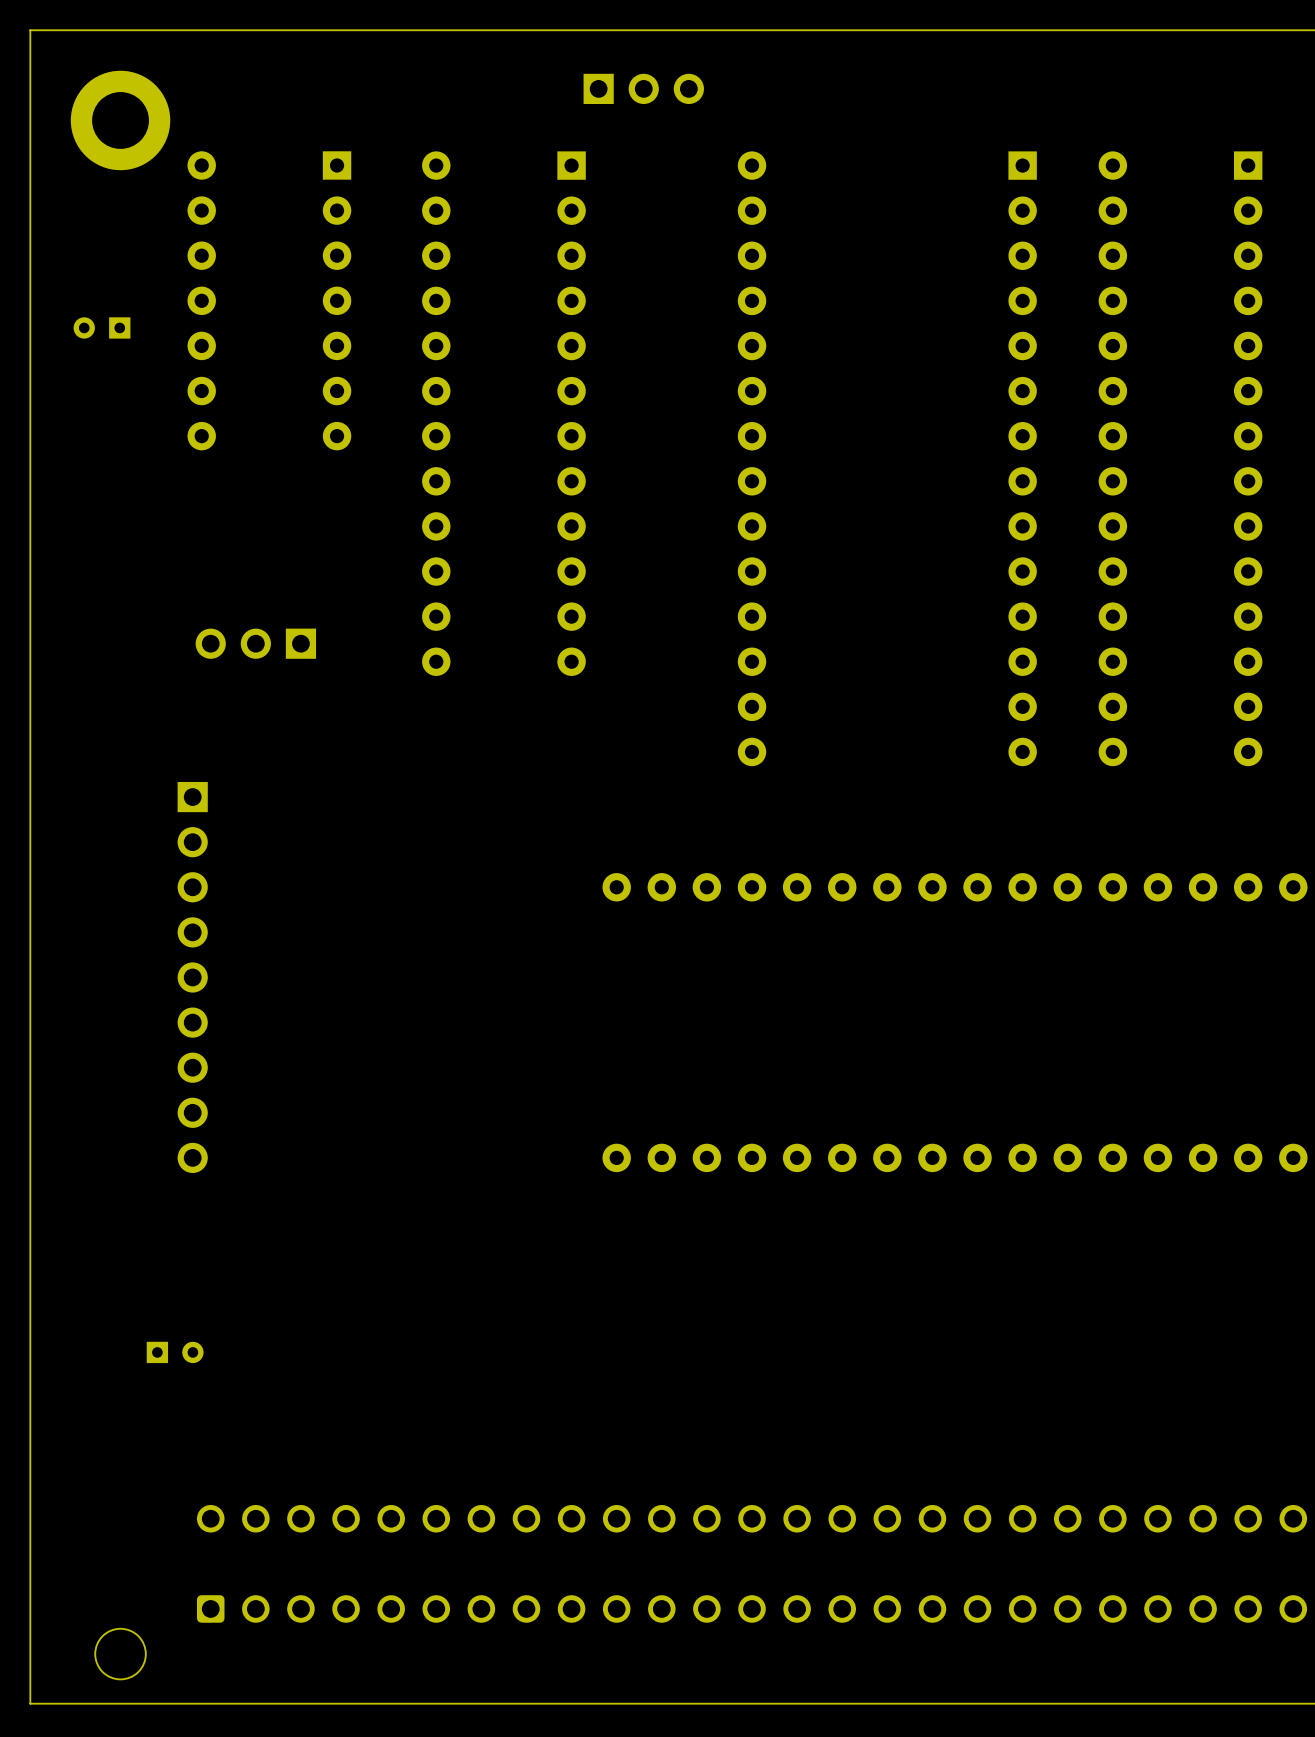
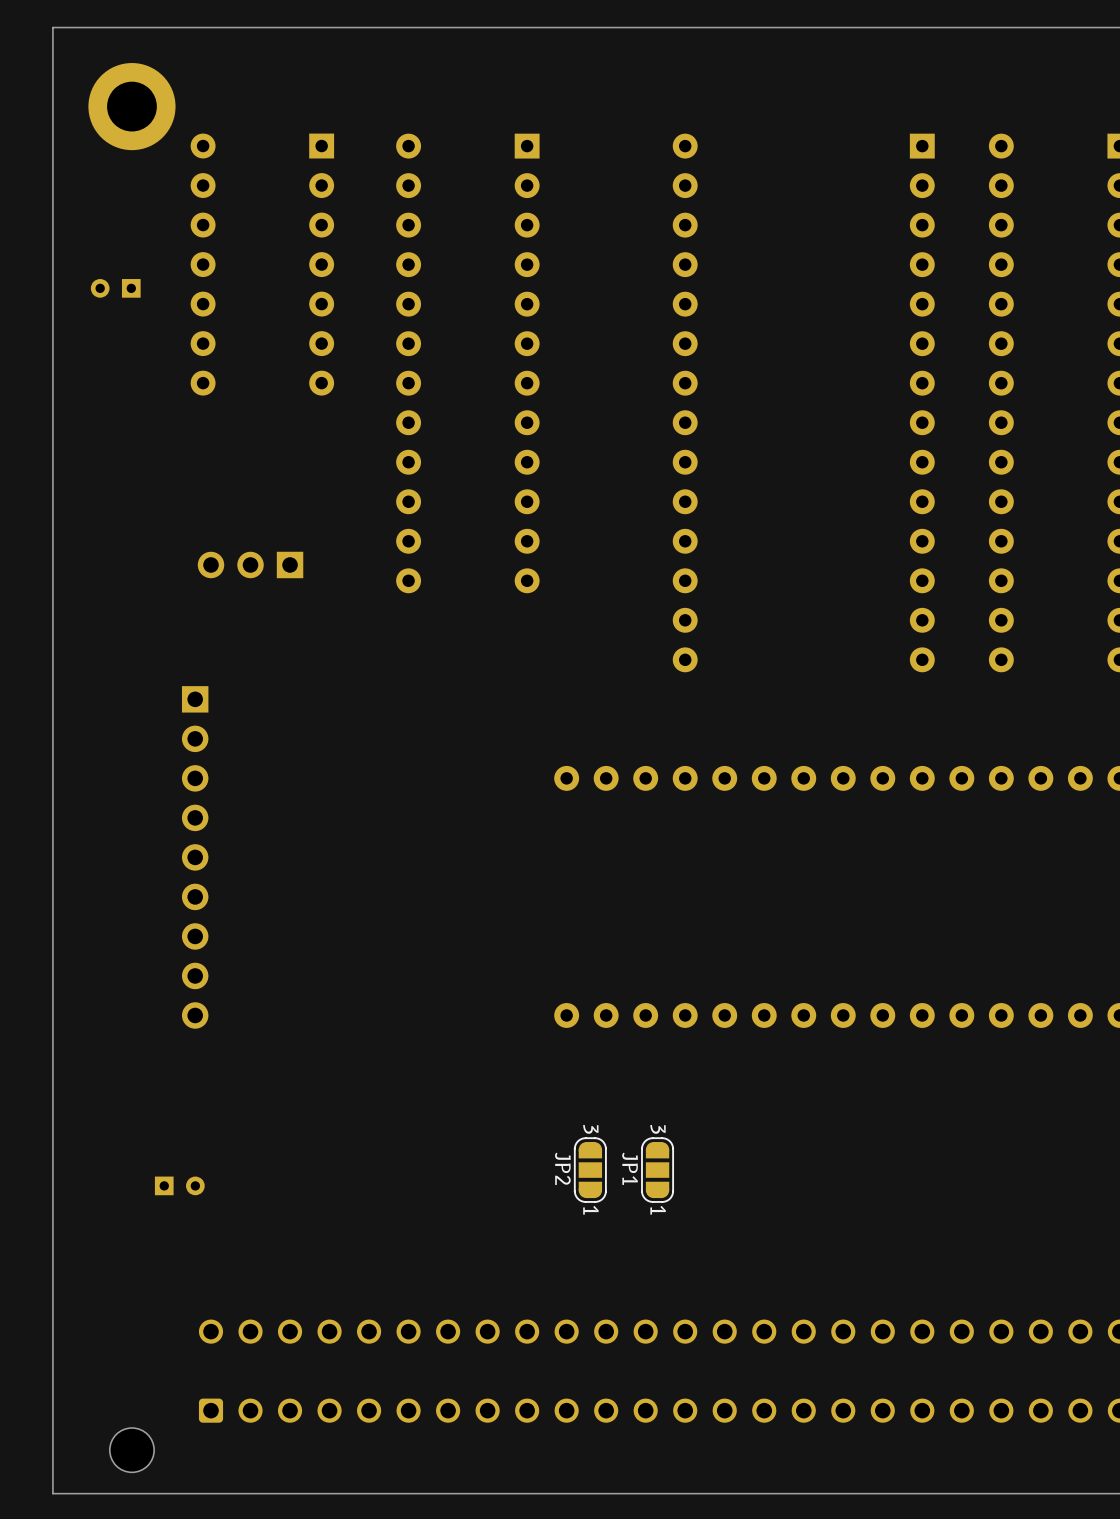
part: (643, 88) -> none
JP2: none -> (590, 1170)
JP1: none -> (657, 1170)

